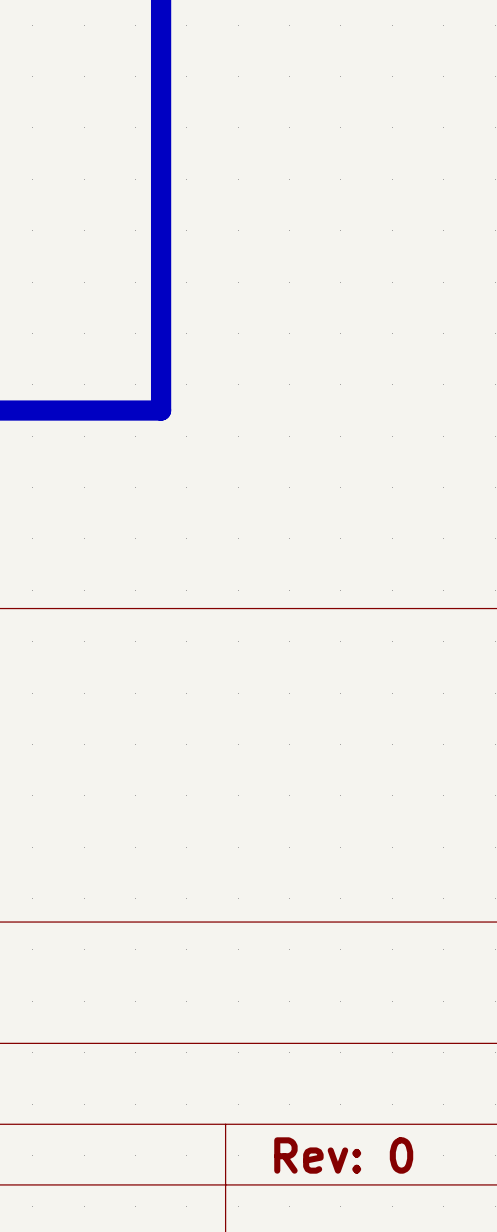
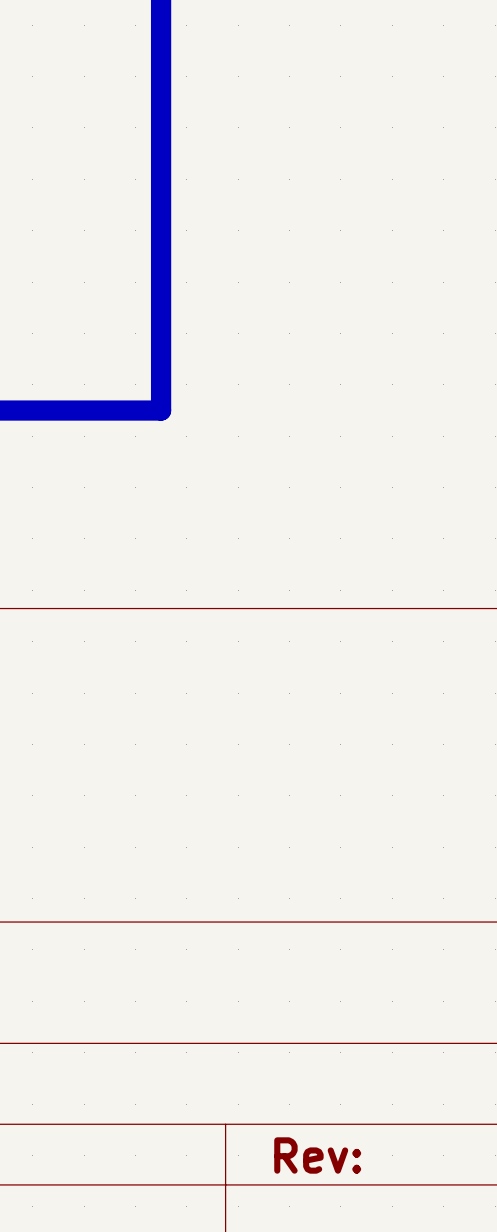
title block: Rev: 0 (343, 1155) -> Rev: (317, 1155)

